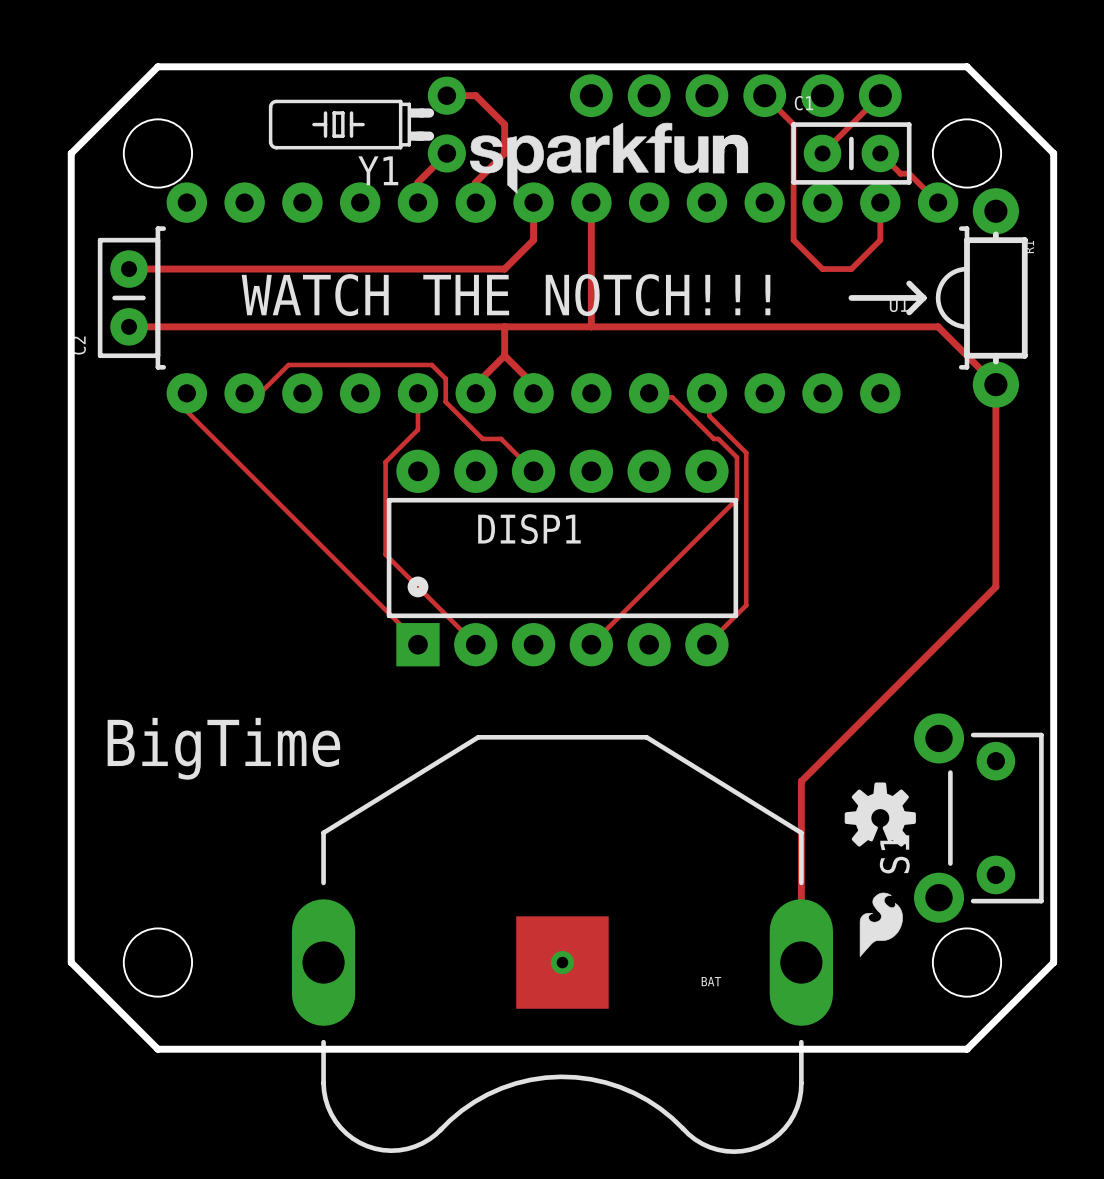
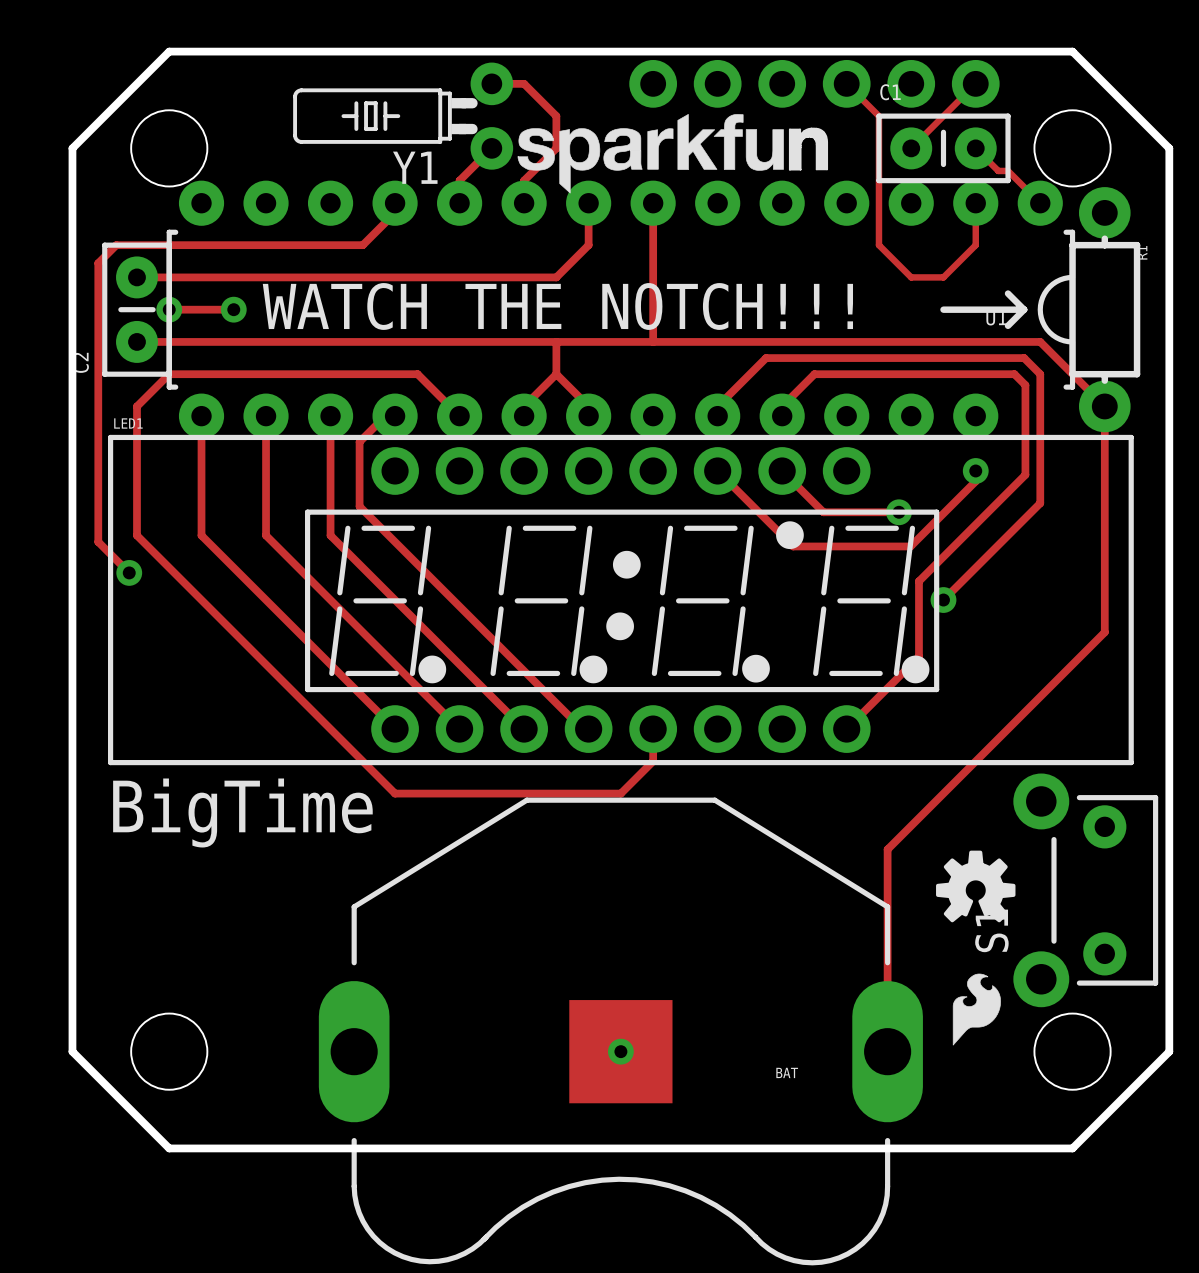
track: none -> (395, 203) (395, 212) (362, 245) (116, 245) (98, 263) (98, 541) (129, 572)
track: none -> (169, 309) (233, 309)
via: none -> (169, 309)
via: none -> (233, 309)
track: (244, 393) (260, 392) (288, 364) (431, 364) (445, 378) (445, 401) (482, 438) (501, 438) (533, 471) -> (266, 416) (266, 535) (459, 729)
track: none -> (330, 416) (330, 535) (524, 729)
track: none -> (395, 416) (385, 416) (359, 441) (359, 506) (582, 729) (588, 729)
track: (417, 393) (417, 429) (385, 462) (385, 554) (475, 644) -> (459, 416) (417, 374) (169, 374) (136, 406) (136, 535) (395, 793) (620, 793) (653, 761) (653, 729)
track: (649, 393) (649, 397) (672, 397) (713, 438) (718, 438) (736, 457) (736, 499) (591, 644) -> (717, 416) (717, 406) (766, 358) (1024, 358) (1040, 374) (1040, 503) (943, 600)
track: (706, 393) (709, 397) (709, 415) (746, 452) (746, 605) (706, 644) -> (782, 416) (782, 406) (814, 374) (1014, 374) (1025, 385) (1025, 474) (918, 581) (918, 656) (846, 729)
track: (186, 411) (417, 642) (417, 644) -> (201, 436) (201, 535) (395, 729)
track: none -> (717, 470) (793, 546) (910, 546) (975, 481) (975, 470)
track: none -> (782, 470) (823, 512) (898, 512)
via: none -> (975, 470)
via: none -> (898, 512)
via: none -> (129, 572)
DISP1: (562, 558) -> none
LED1: none -> (620, 600)
via: none -> (943, 600)

